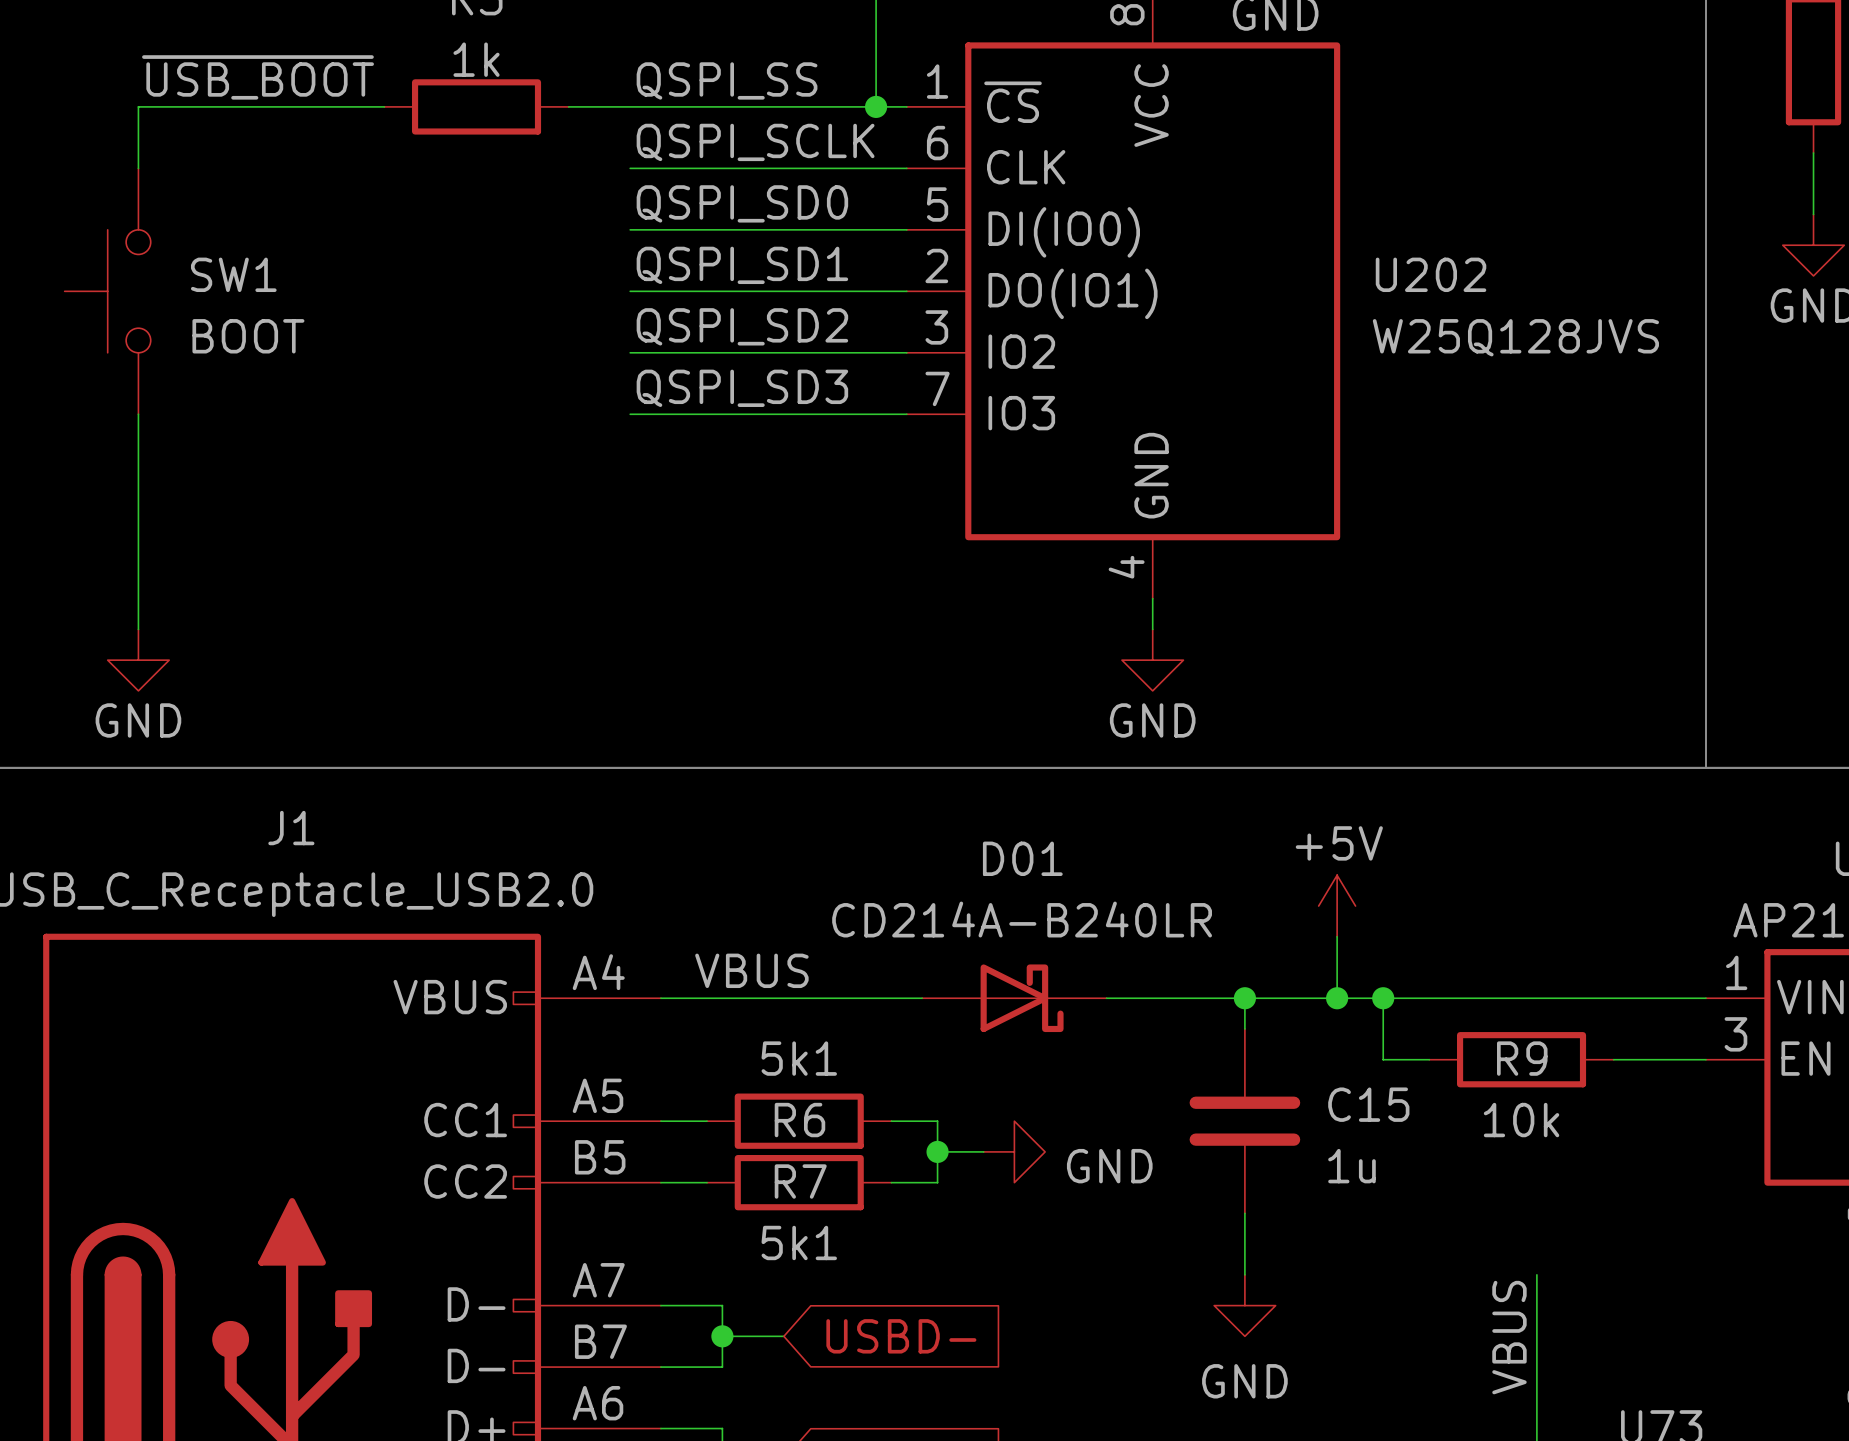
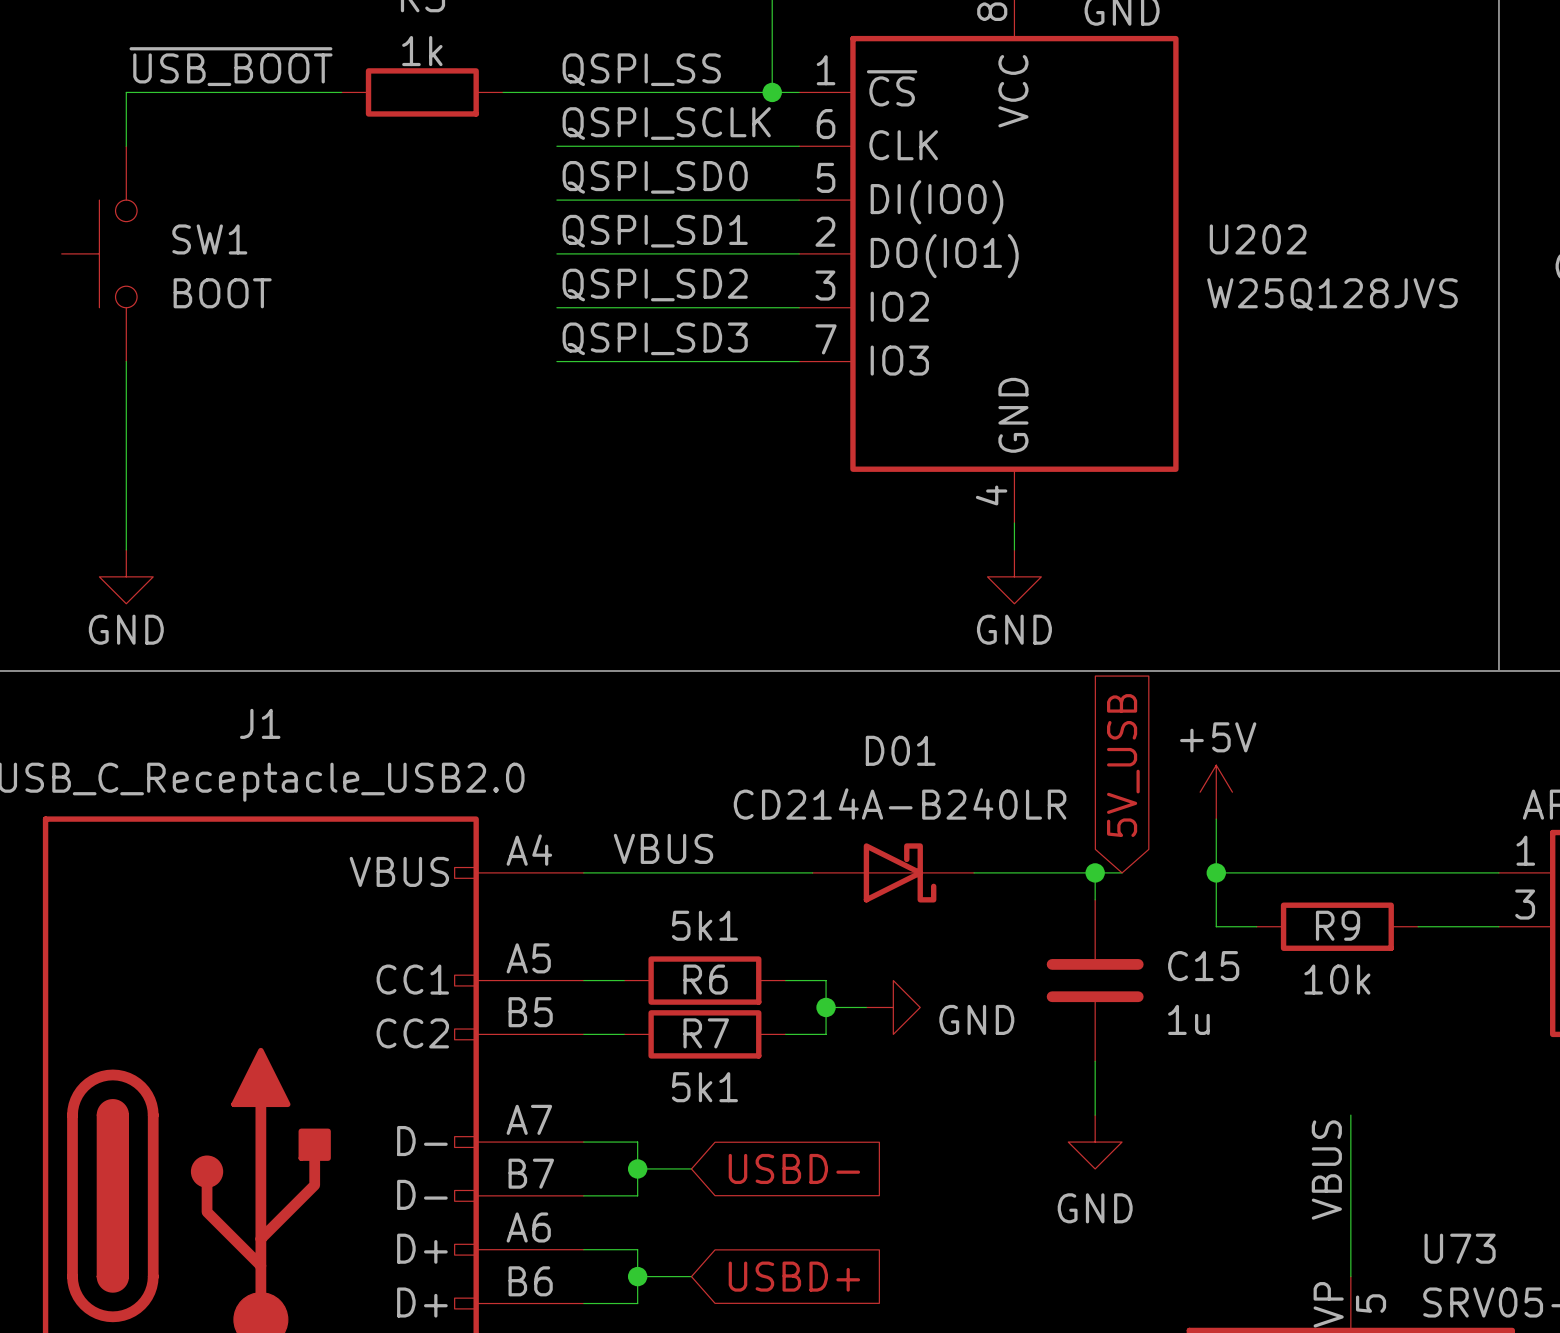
global label: none -> 5V_USB (1123, 765)
power symbol position: +5V (1337, 906) -> +5V (1216, 792)
wire: (1337, 936) (1337, 998) -> none
wire: (1275, 998) (1383, 998) -> (1216, 819) (1216, 872)
junction: (1337, 998) -> none

